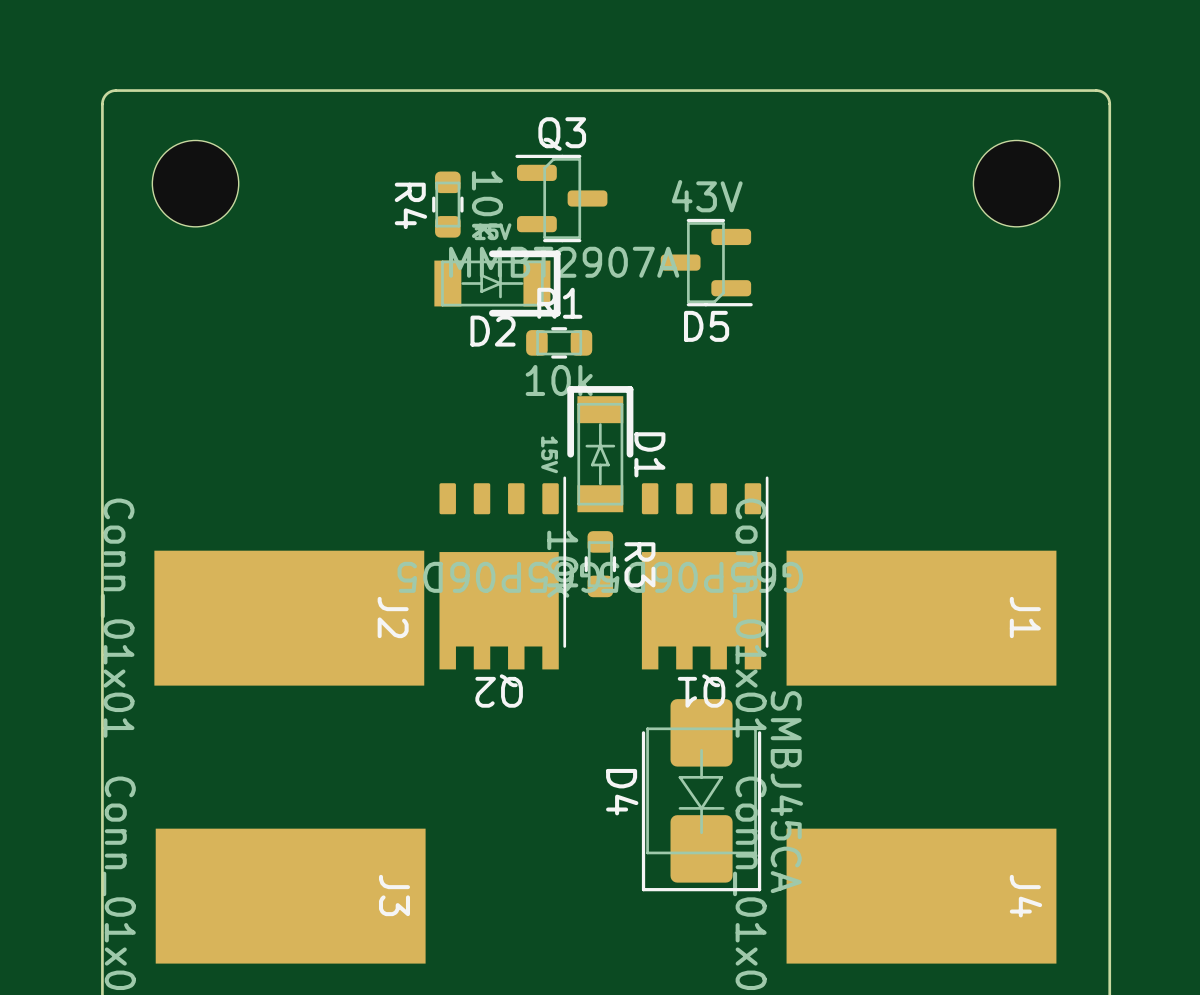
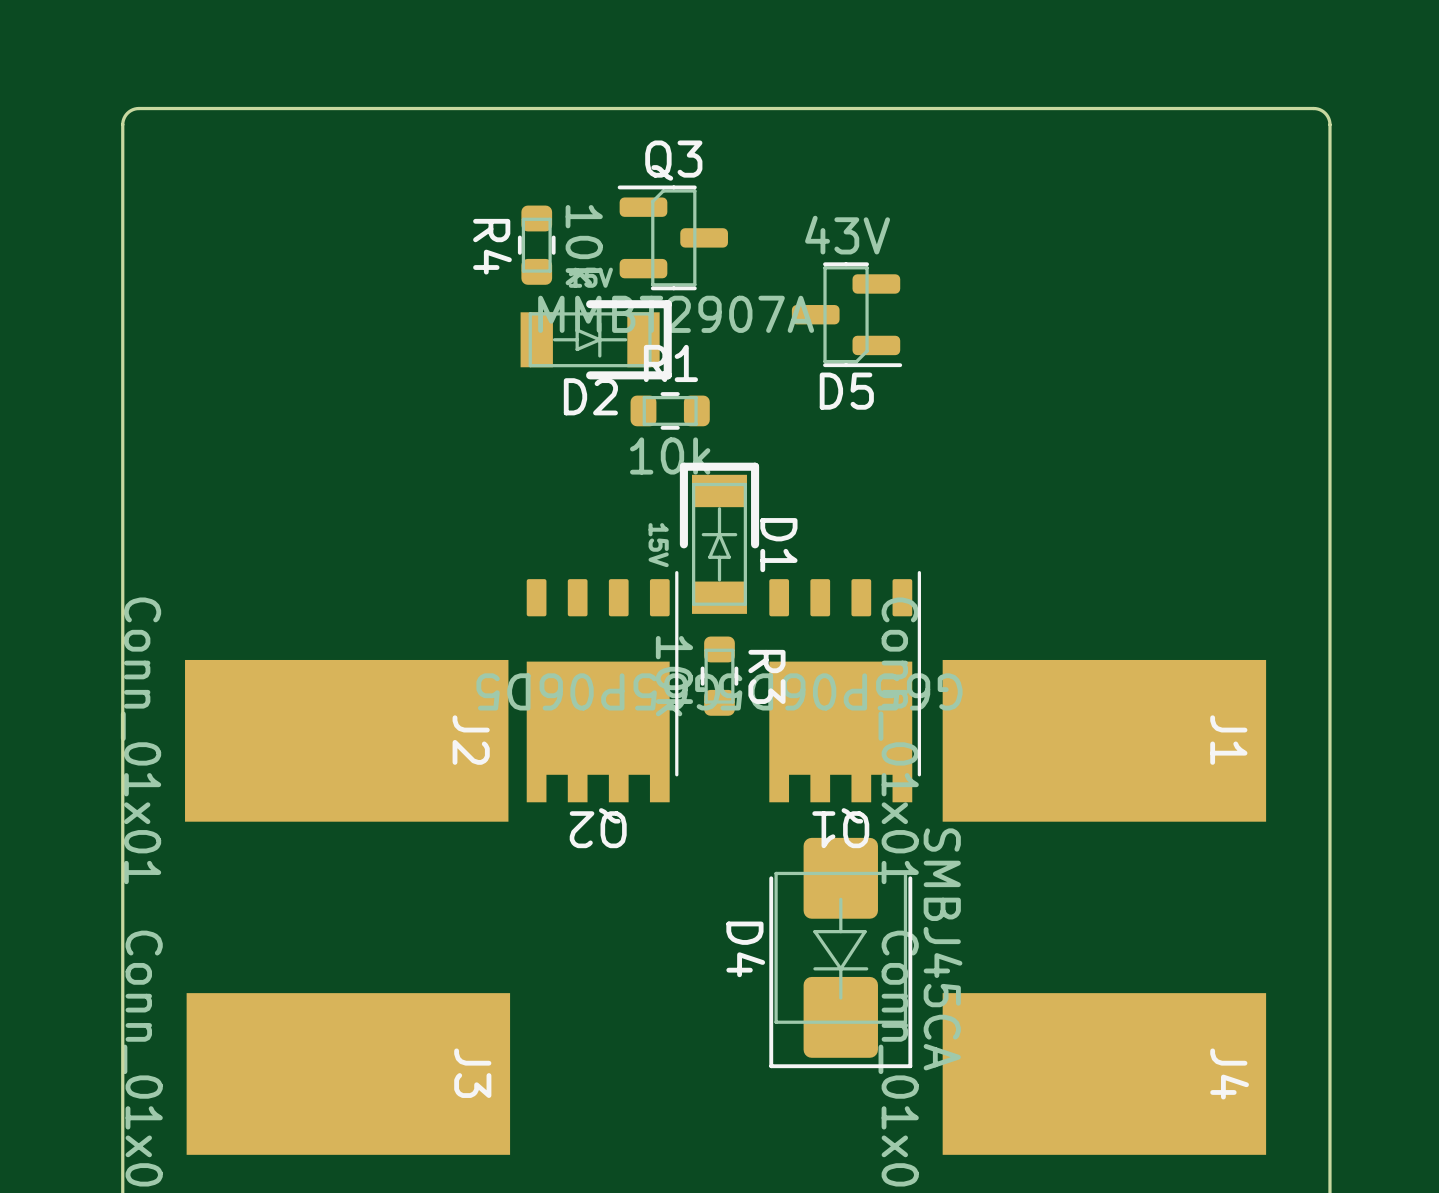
part: (195, 183) -> none
part: (1016, 183) -> none

